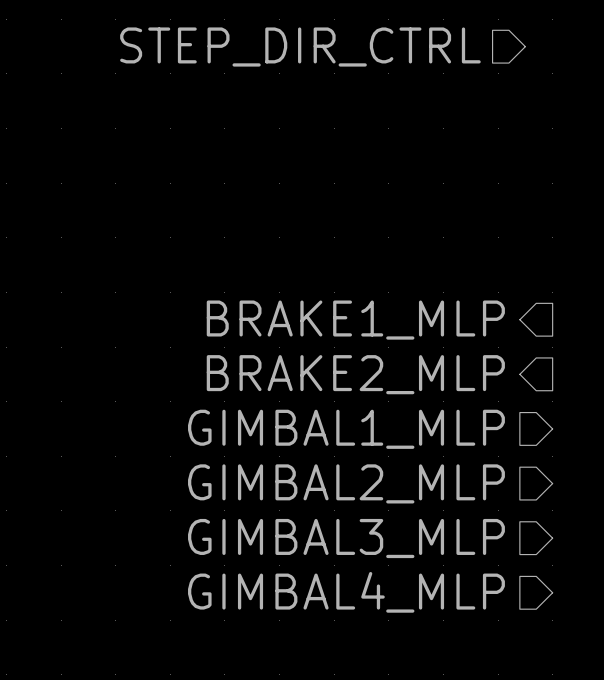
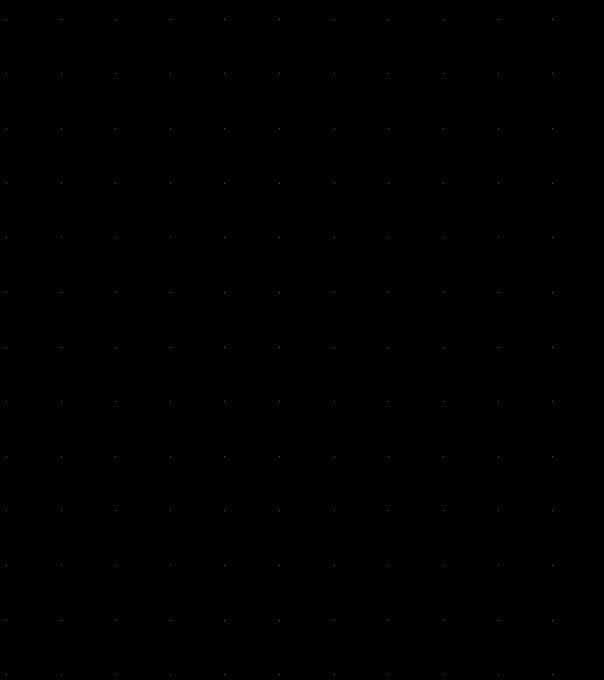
hierarchical label: STEP_DIR_CTRL (300, 47) -> none
hierarchical label: BRAKE1_MLP (355, 320) -> none
hierarchical label: BRAKE2_MLP (355, 374) -> none
hierarchical label: GIMBAL1_MLP (346, 429) -> none
hierarchical label: GIMBAL2_MLP (346, 483) -> none
hierarchical label: GIMBAL3_MLP (346, 538) -> none
hierarchical label: GIMBAL4_MLP (346, 592) -> none

